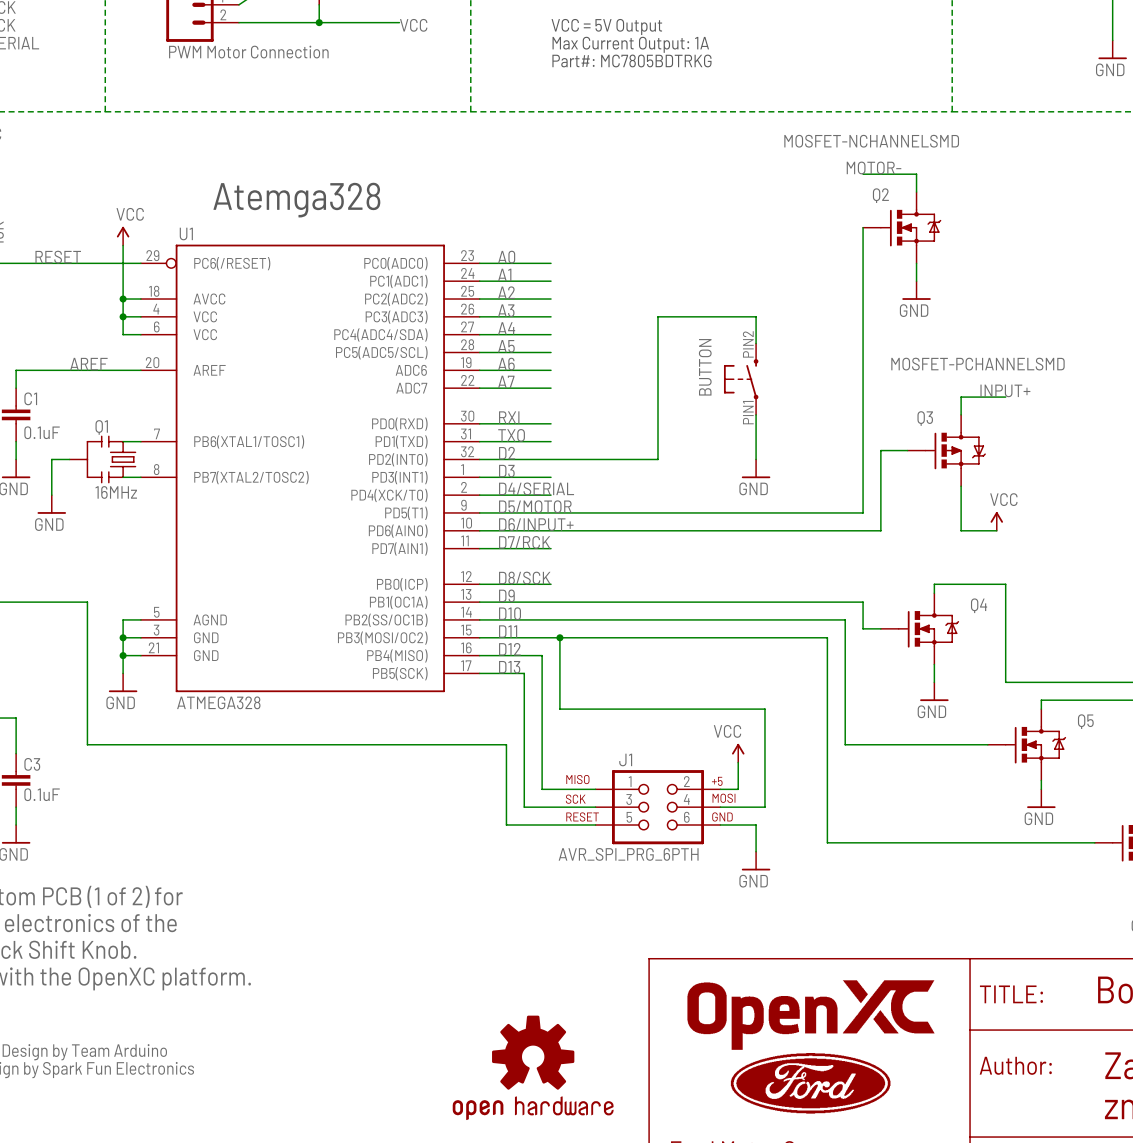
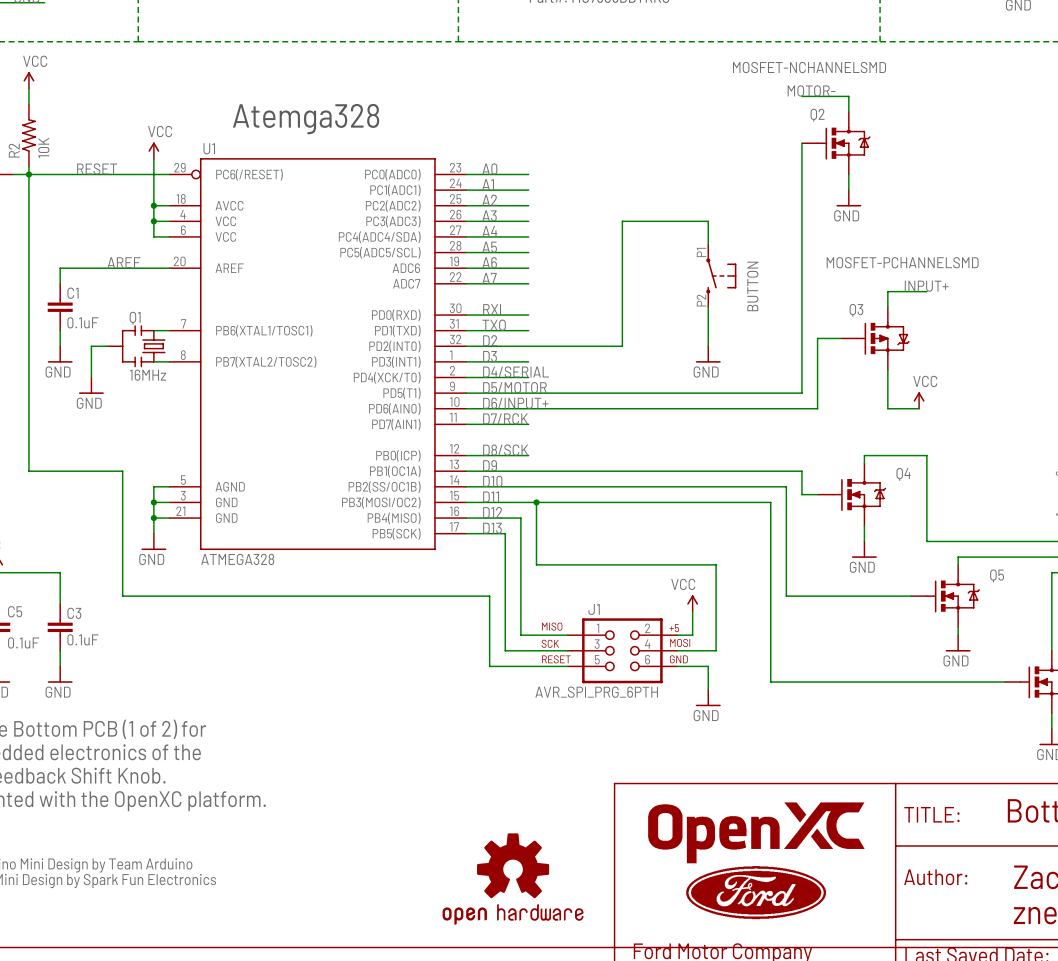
BUTTON: (741, 379) -> none
BUTTON: none -> (721, 275)

